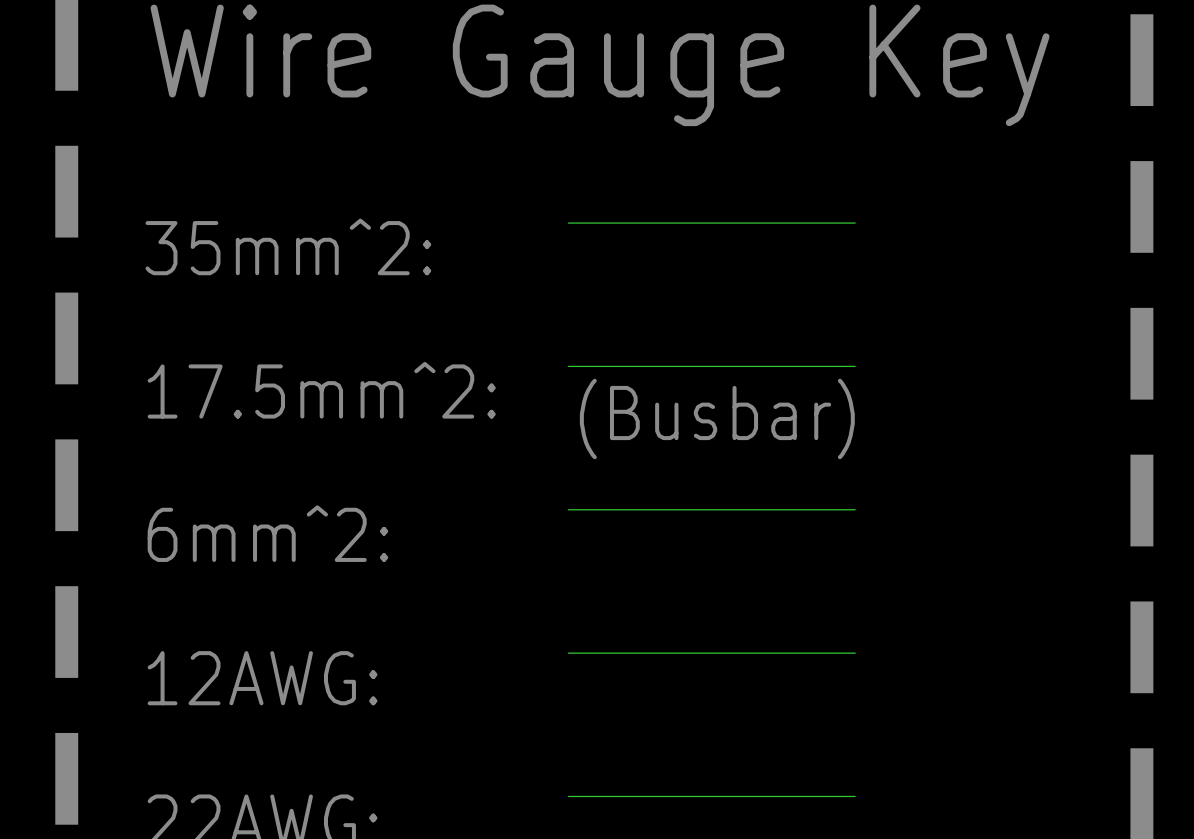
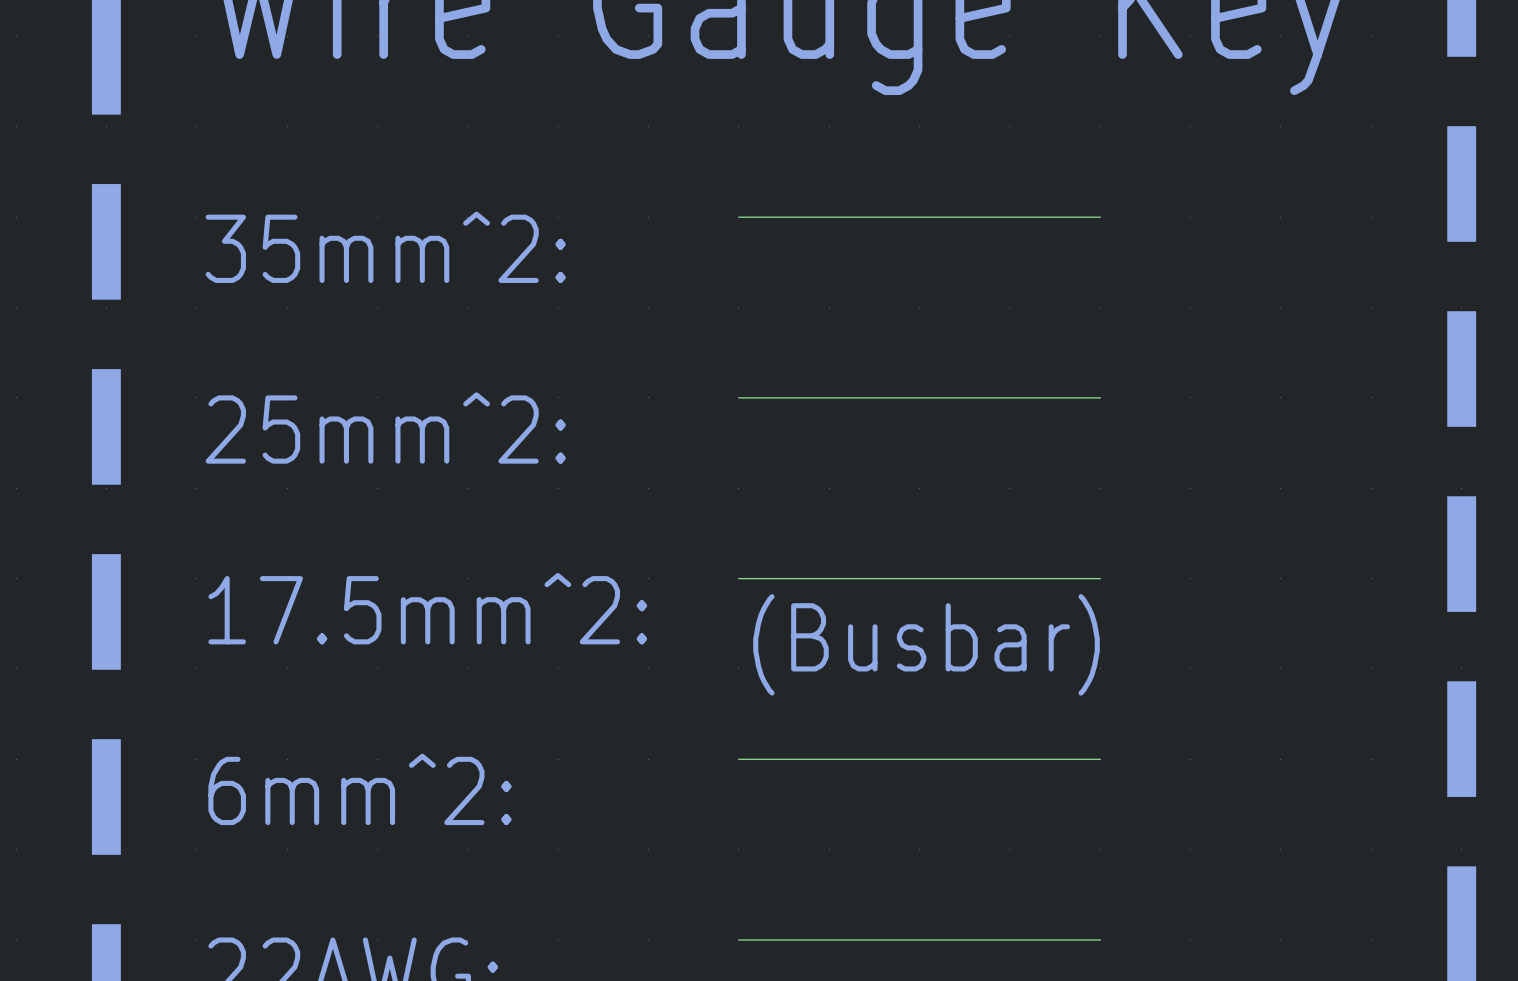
text: 17.5mm^2: (321, 390) -> 25mm^2: (385, 428)
text position: (Busbar) (717, 418) -> (Busbar) (926, 644)
text: 6mm^2: (267, 533) -> 17.5mm^2: (427, 608)
text: 12AWG: (262, 678) -> 6mm^2: (360, 789)

